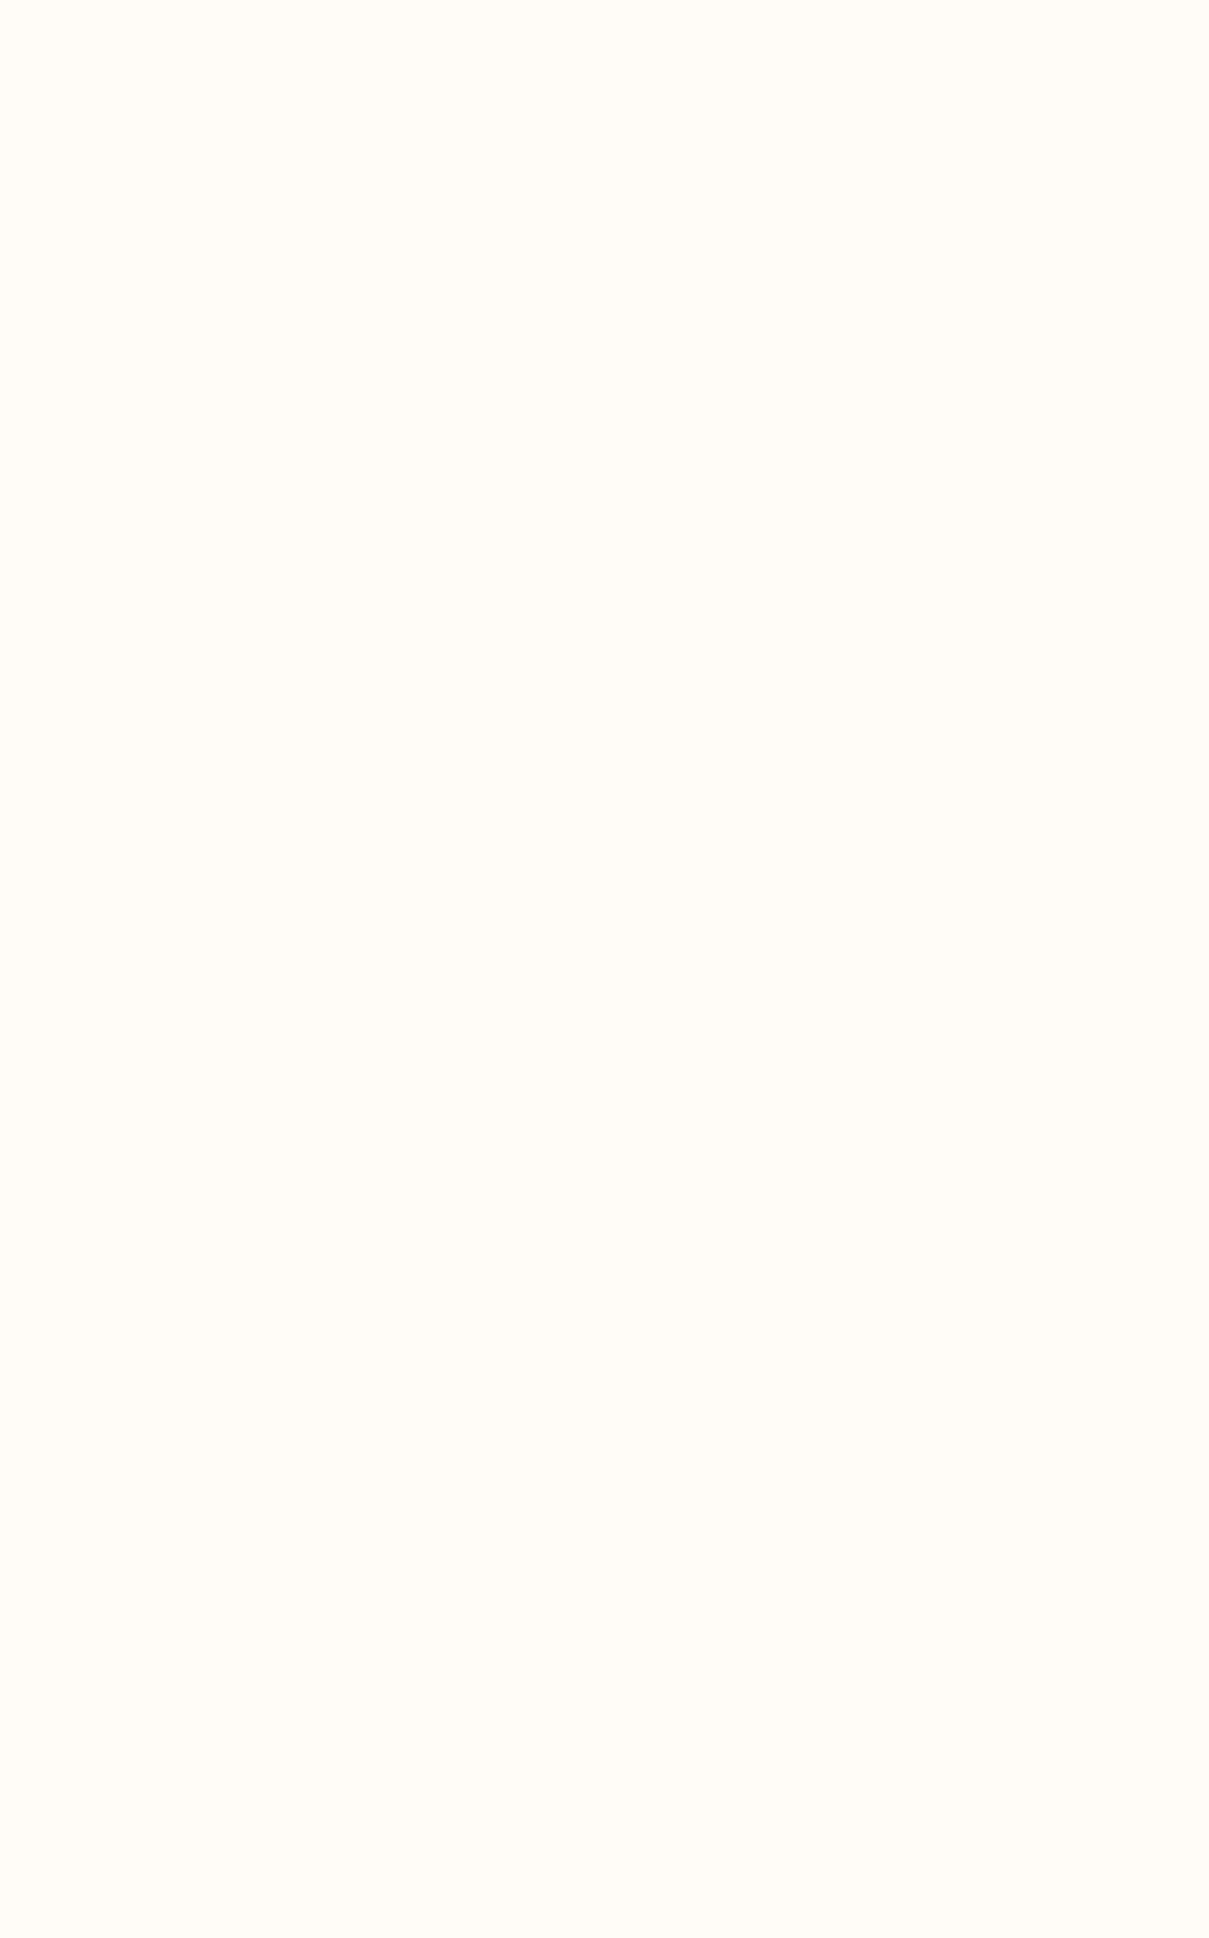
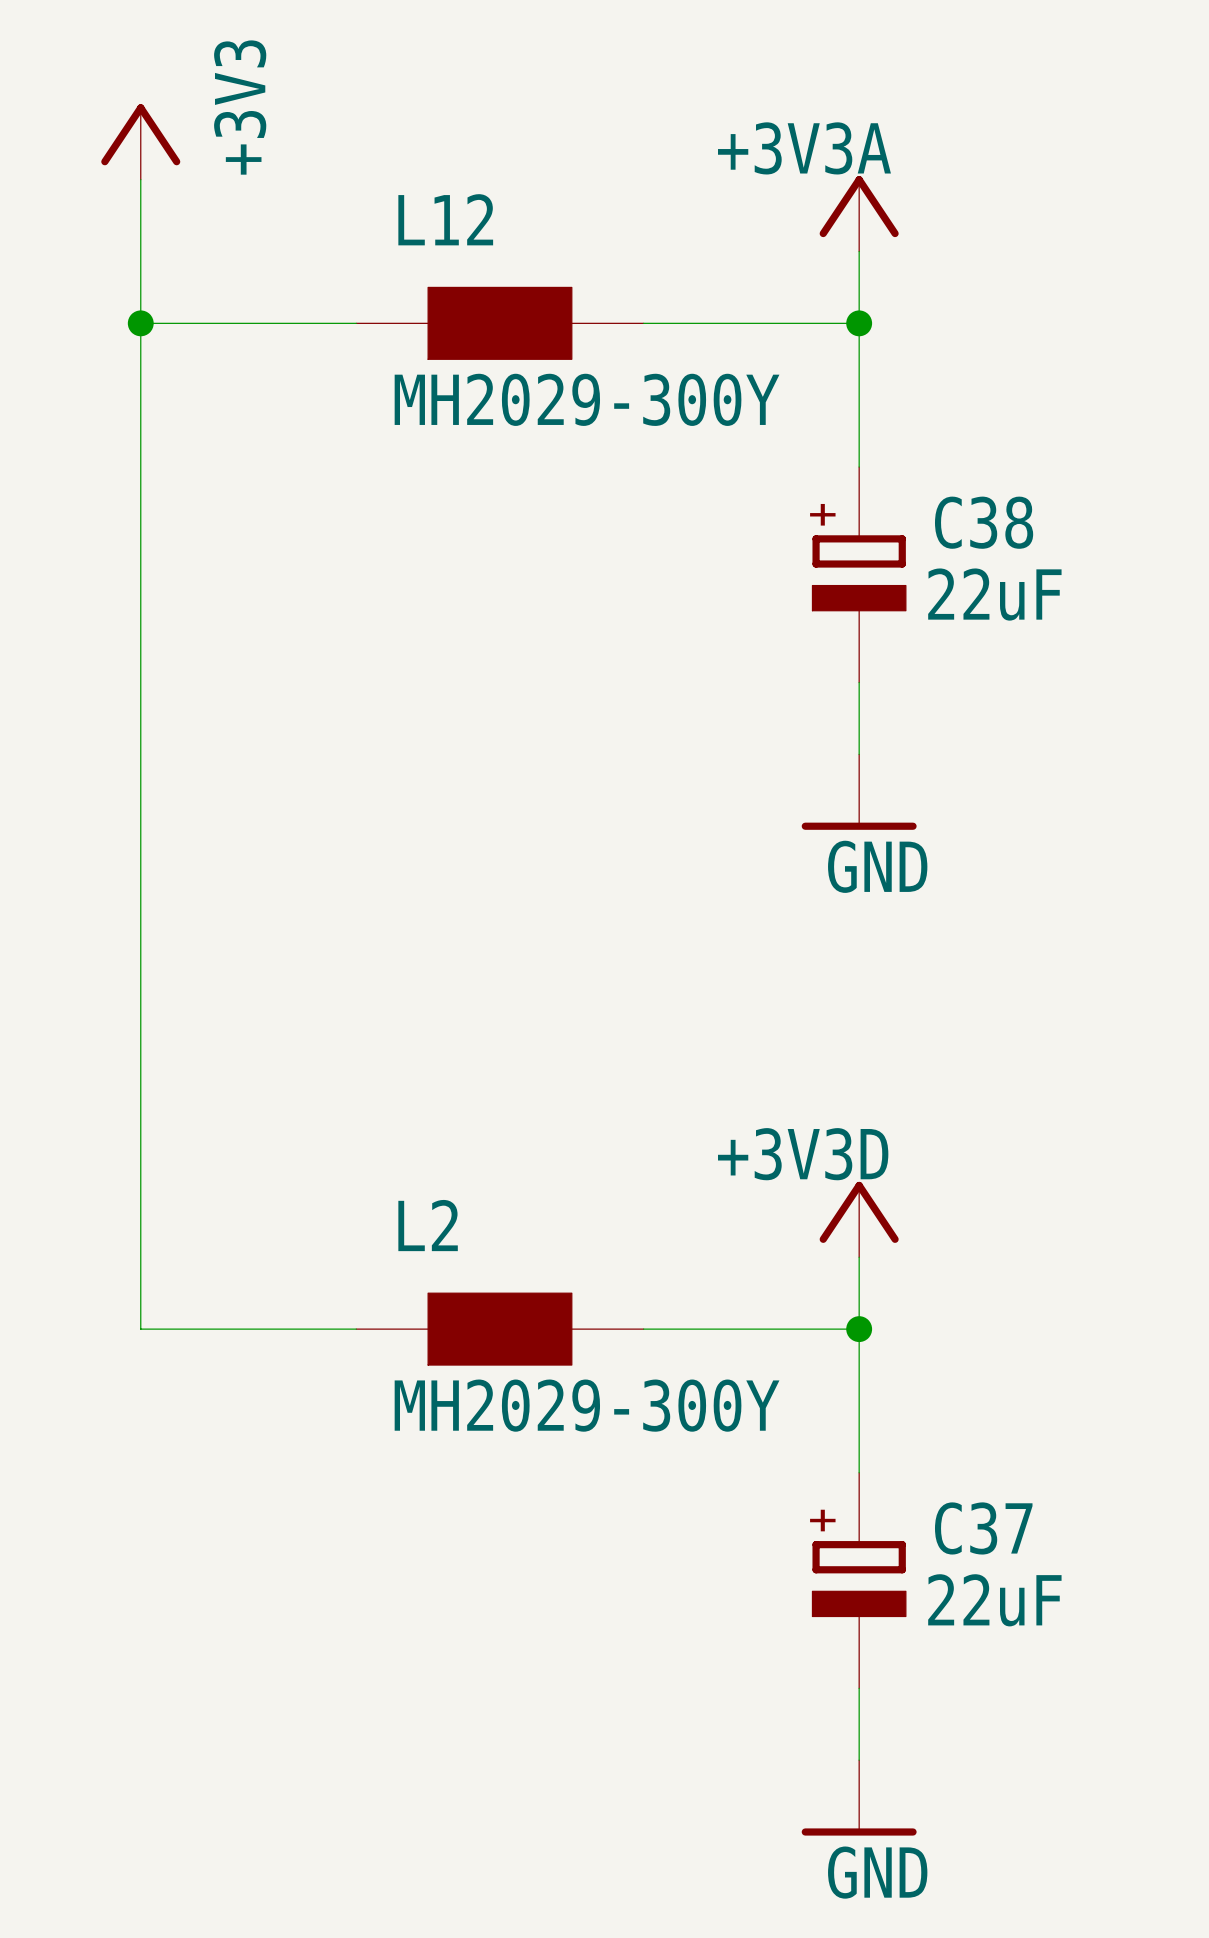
power symbol: none -> +3V3 (140, 141)
wire: none -> (140, 179) (140, 1329) (356, 1329)
power symbol: none -> +3V3A (859, 213)
wire: none -> (859, 251) (859, 467)
wire: none -> (140, 323) (356, 323)
junction: none -> (140, 323)
L12: none -> MH2029-300Y (499, 323)
wire: none -> (643, 323) (859, 323)
junction: none -> (859, 323)
C38: none -> 22uF (859, 574)
wire: none -> (859, 682) (859, 754)
power symbol: none -> GND (859, 792)
power symbol: none -> +3V3D (859, 1219)
wire: none -> (859, 1257) (859, 1472)
L2: none -> MH2029-300Y (499, 1329)
wire: none -> (643, 1329) (859, 1329)
junction: none -> (859, 1329)
C37: none -> 22uF (859, 1580)
wire: none -> (859, 1688) (859, 1760)
power symbol: none -> GND (859, 1797)

